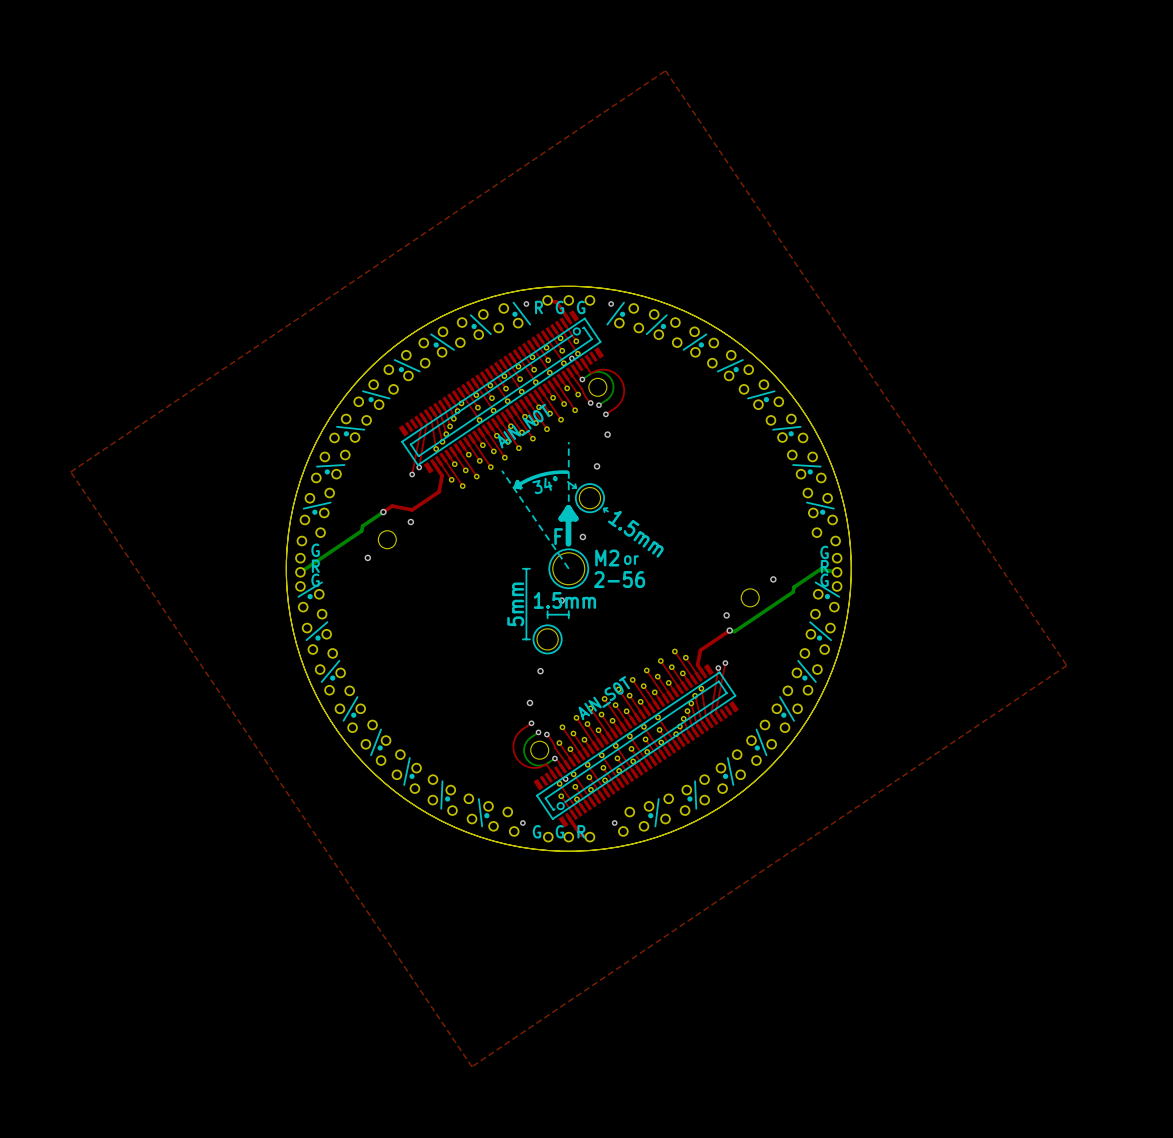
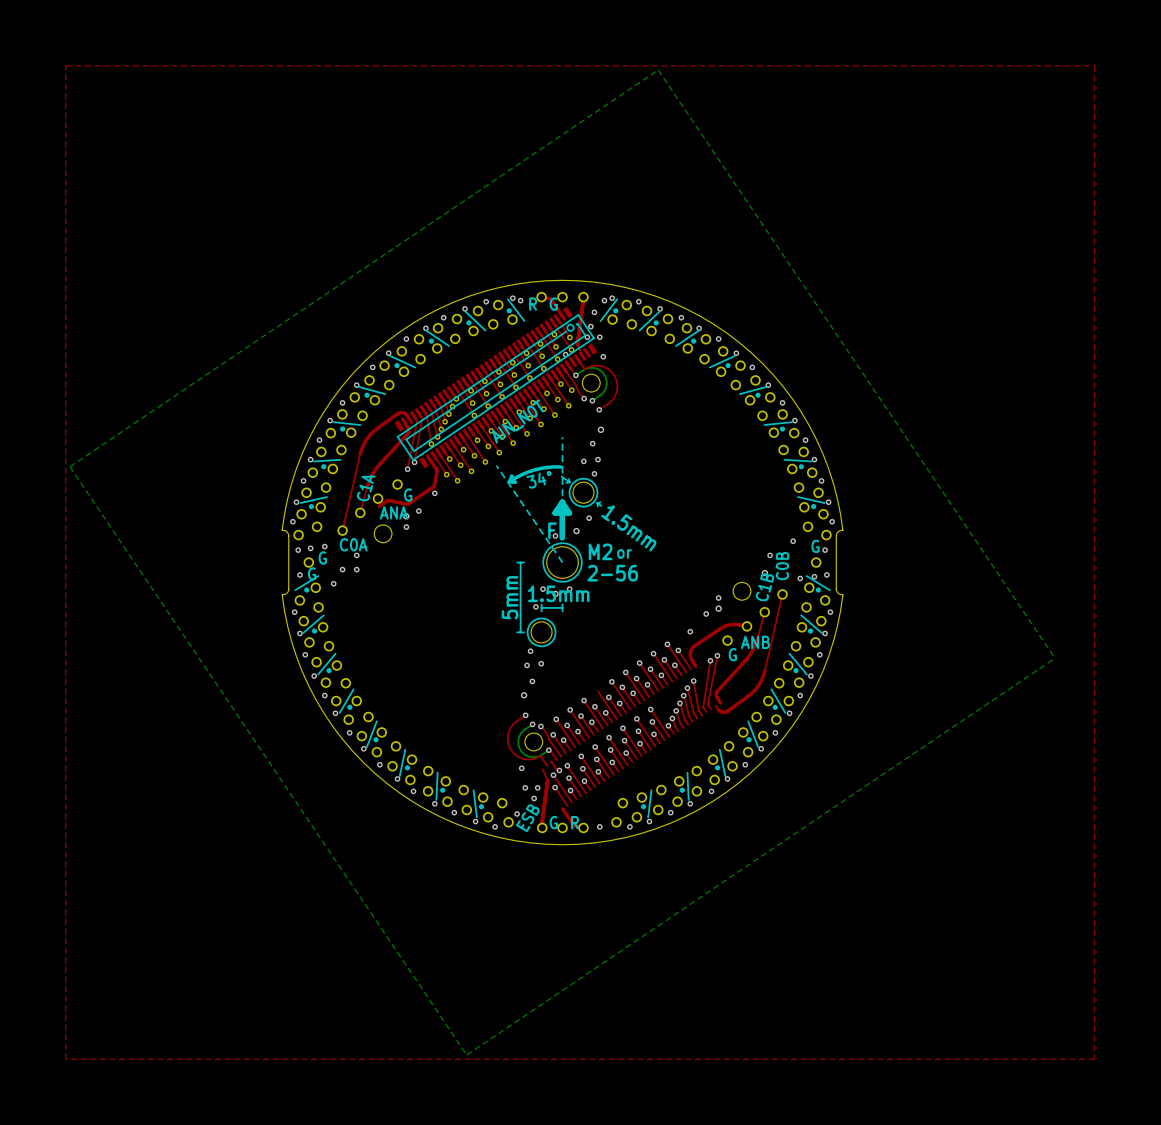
top zone outline: (665, 70) (70, 471) (471, 1066) (1066, 665) (665, 70) -> (65, 65) (65, 1059) (1094, 1059) (1094, 65) (65, 65)
round board edge: [286, 286, 852, 852] -> none
top track: none -> (583, 296) (577, 344) (582, 355)
via: none -> (512, 298)
via: none -> (612, 298)
via: none -> (486, 301)
via: none -> (638, 301)
text: G (581, 307) -> none
via: none -> (464, 308)
via: none -> (660, 308)
via: none -> (594, 312)
via: none -> (443, 317)
via: none -> (681, 317)
via: none -> (590, 326)
via: none -> (425, 328)
via: none -> (699, 328)
via: none -> (587, 337)
via: none -> (599, 337)
via: none -> (406, 339)
via: none -> (718, 339)
via: none -> (388, 353)
via: none -> (736, 353)
via: none -> (603, 356)
via: none -> (372, 367)
via: none -> (752, 367)
via: none -> (356, 385)
via: none -> (768, 385)
via: none -> (342, 402)
via: none -> (782, 402)
top track: none -> (409, 419) (404, 413) (398, 413) (372, 432) (366, 439) (360, 454) (342, 530)
via: none -> (330, 420)
via: none -> (794, 420)
top track: none -> (404, 422) (408, 432) (372, 474) (360, 512)
via: none -> (319, 440)
via: none -> (805, 440)
via: none -> (592, 443)
via: none -> (310, 459)
via: none -> (598, 459)
via: none -> (814, 459)
via: none -> (583, 461)
via: (597, 466) -> none
via: none -> (594, 473)
via: none -> (303, 480)
via: none -> (821, 480)
part: none -> (397, 484)
text: none -> C1A (366, 488)
via: none -> (434, 493)
text: none -> G (408, 495)
part: none -> (378, 498)
via: none -> (296, 502)
via: none -> (828, 502)
bottom track: (383, 512) (362, 526) (361, 531) (300, 572) -> none
via: (383, 512) -> none
via: none -> (418, 511)
part: none -> (360, 512)
text: none -> ANA (394, 512)
via: none -> (589, 518)
via: none -> (292, 521)
via: none -> (832, 521)
via: none -> (406, 527)
board edge: none -> (282, 530) (286, 531) (288, 535) (288, 589) (286, 593) (282, 594) (291, 641) (301, 670) (315, 699) (342, 738) (374, 773) (399, 792) (426, 809) (454, 823) (484, 833) (530, 842) (578, 844) (609, 840) (640, 833) (684, 816) (712, 801) (738, 783) (761, 762) (782, 738) (809, 699) (828, 656) (837, 625) (842, 594) (838, 593) (836, 589) (836, 535) (838, 531) (842, 530) (833, 483) (823, 454) (809, 425) (782, 386) (750, 351) (725, 332) (698, 315) (670, 301) (640, 291) (594, 282) (546, 280) (515, 284) (484, 291) (440, 308) (412, 323) (386, 341) (363, 362) (342, 386) (315, 425) (296, 468) (287, 499) (282, 530)
part: none -> (342, 530)
via: none -> (555, 535)
via: none -> (793, 541)
text position: G (315, 550) -> G (322, 557)
text: none -> C0A (353, 544)
via: none -> (324, 546)
via: none -> (310, 548)
via: none -> (298, 550)
via: none -> (825, 550)
via: (367, 557) -> none
part: (300, 558) -> none
part: (837, 558) -> none
via: none -> (356, 555)
via: none -> (770, 555)
text: R (315, 566) -> none
text: R (824, 566) -> none
part: none -> (308, 562)
part: none -> (816, 562)
part: (300, 572) -> none
text: none -> C0B (782, 566)
bottom track: (837, 572) (820, 569) (794, 587) (793, 592) (734, 631) (729, 630) -> none
part: (837, 572) -> none
via: none -> (342, 569)
via: none -> (356, 569)
text position: G (824, 580) -> G (732, 654)
via: none -> (299, 574)
via: none -> (826, 574)
via: none -> (814, 576)
via: none -> (800, 578)
part: (300, 586) -> none
part: (837, 586) -> none
via: none -> (333, 583)
text: none -> C1B (764, 587)
via: none -> (543, 589)
via: none -> (569, 589)
top track: none -> (782, 594) (764, 670) (758, 685) (752, 692) (726, 711) (720, 711) (715, 705)
part: none -> (782, 594)
via: none -> (718, 598)
via: none -> (535, 606)
via: none -> (294, 612)
top track: none -> (764, 612) (752, 650) (716, 692) (720, 702)
part: none -> (764, 612)
via: none -> (830, 612)
via: none -> (706, 613)
top track: (729, 630) (700, 650) (697, 664) (703, 673) -> (747, 626) (734, 624) (724, 626) (693, 646) (690, 654) (695, 666)
via: (729, 630) -> none
part: none -> (747, 626)
via: none -> (690, 631)
via: none -> (299, 633)
via: none -> (825, 633)
part: none -> (727, 640)
text: none -> ANB (755, 642)
via: none -> (667, 644)
via: none -> (678, 650)
via: none -> (530, 651)
via: none -> (653, 653)
via: none -> (305, 654)
via: none -> (819, 654)
via: none -> (664, 659)
via: none -> (639, 663)
via: (540, 671) -> none
via: none -> (541, 663)
via: none -> (527, 665)
via: none -> (674, 665)
via: none -> (650, 669)
via: none -> (625, 672)
via: none -> (661, 675)
via: none -> (314, 676)
via: none -> (810, 676)
via: none -> (636, 678)
via: none -> (532, 681)
via: none -> (693, 681)
via: none -> (611, 681)
via: none -> (647, 684)
via: none -> (622, 687)
via: none -> (687, 688)
via: none -> (633, 693)
via: none -> (324, 695)
via: none -> (683, 695)
via: none -> (800, 695)
via: none -> (608, 697)
via: none -> (584, 700)
via: none -> (619, 703)
via: none -> (679, 703)
via: none -> (594, 706)
via: none -> (570, 709)
via: none -> (650, 709)
via: none -> (676, 710)
via: none -> (605, 712)
via: none -> (335, 713)
via: none -> (789, 713)
via: none -> (581, 716)
via: none -> (636, 718)
via: none -> (672, 718)
via: none -> (556, 719)
via: none -> (652, 721)
via: none -> (591, 722)
via: none -> (567, 725)
via: none -> (668, 725)
via: none -> (622, 728)
AIN_S0T: (636, 738) -> none
via: none -> (578, 731)
via: none -> (638, 731)
via: none -> (349, 732)
via: none -> (775, 732)
via: none -> (653, 734)
via: none -> (553, 734)
via: none -> (609, 737)
via: none -> (563, 740)
via: none -> (624, 740)
via: none -> (640, 743)
via: none -> (595, 747)
via: none -> (363, 748)
via: none -> (761, 748)
via: none -> (610, 750)
via: none -> (626, 753)
via: none -> (581, 756)
via: none -> (596, 759)
via: none -> (612, 762)
via: none -> (379, 764)
via: none -> (745, 764)
via: none -> (567, 765)
via: none -> (521, 768)
top track: none -> (542, 769) (547, 780) (541, 828)
via: none -> (582, 768)
via: none -> (598, 771)
via: none -> (553, 775)
via: none -> (568, 778)
via: none -> (397, 778)
via: none -> (727, 778)
via: none -> (584, 781)
via: none -> (525, 787)
via: none -> (537, 787)
via: none -> (555, 787)
via: none -> (570, 790)
via: none -> (413, 791)
via: none -> (711, 791)
via: none -> (534, 798)
via: none -> (434, 803)
via: none -> (690, 803)
via: none -> (454, 812)
via: none -> (670, 812)
via: (614, 823) -> none
via: none -> (475, 821)
via: none -> (649, 821)
text: G (537, 831) -> ESB (527, 818)
via: none -> (495, 826)
via: none -> (599, 826)
via: none -> (629, 826)

